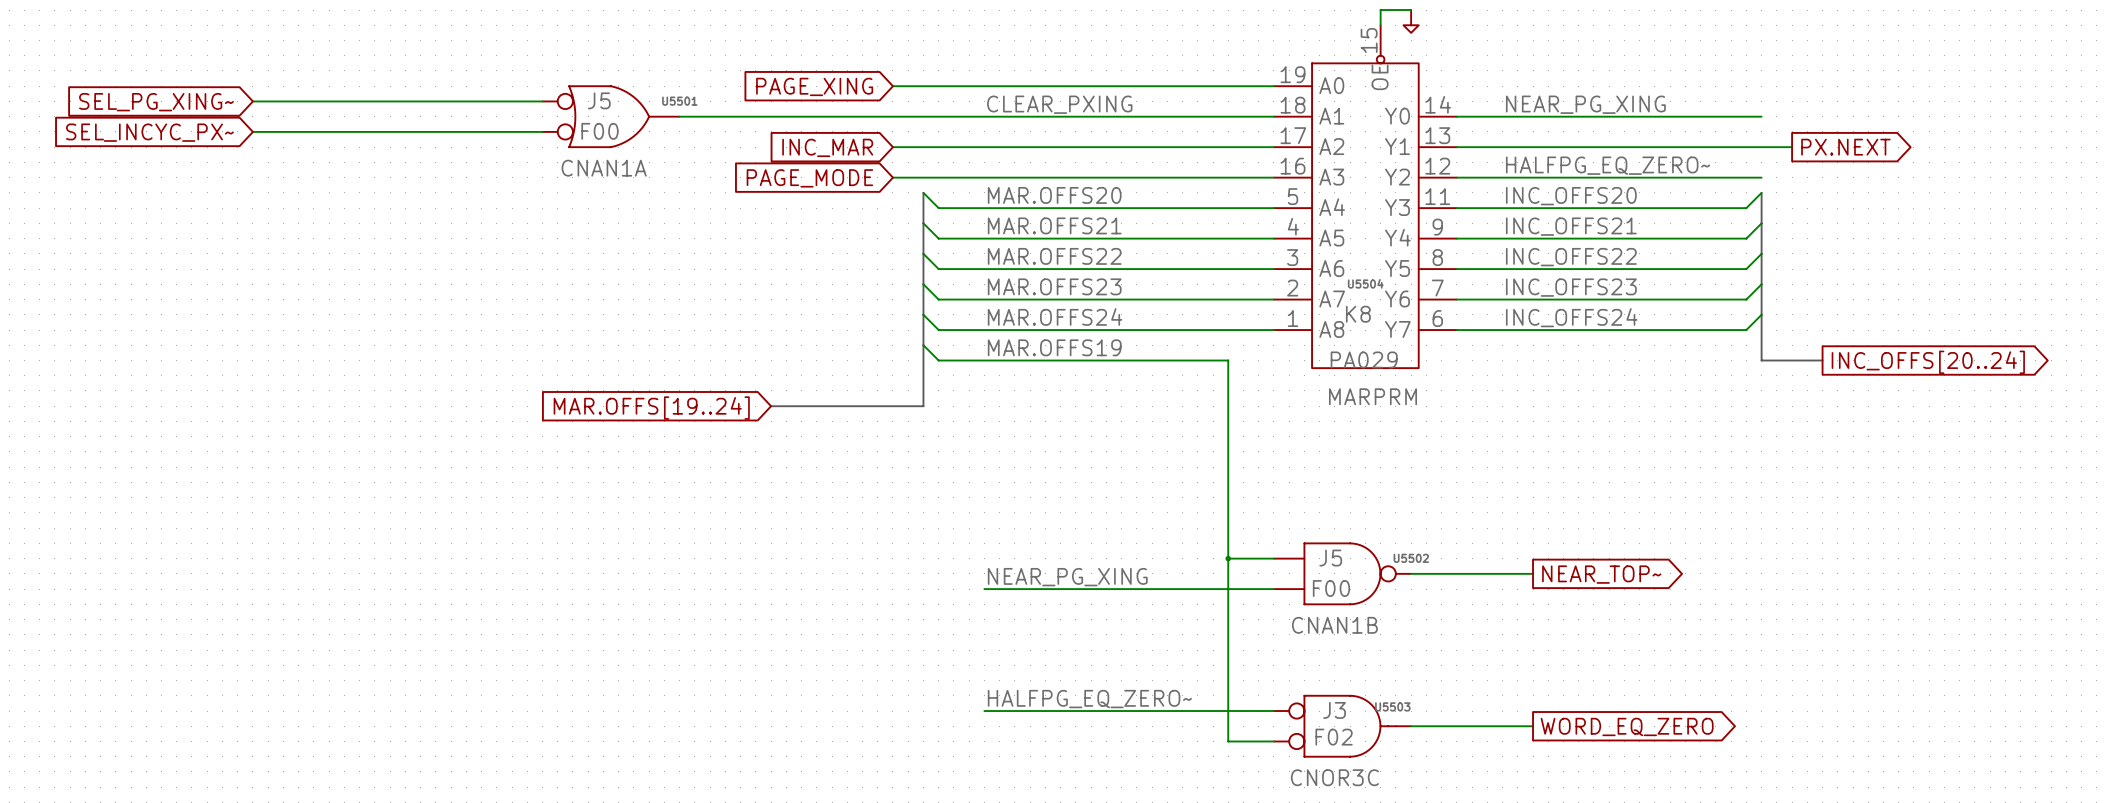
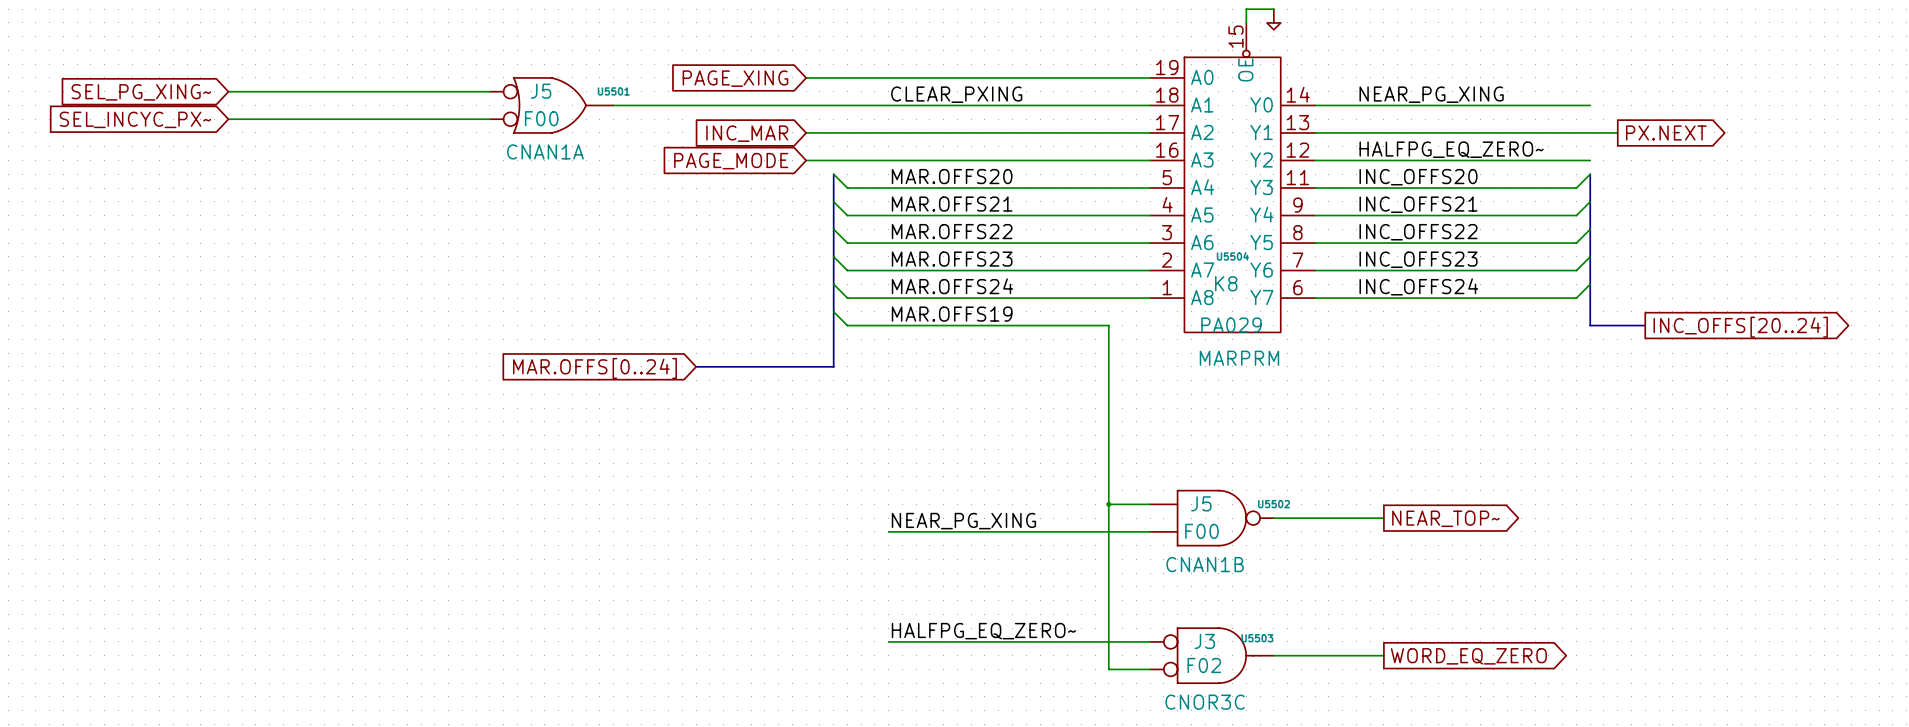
global label: MAR.OFFS[19..24] (651, 408) -> MAR.OFFS[0..24] (594, 368)

